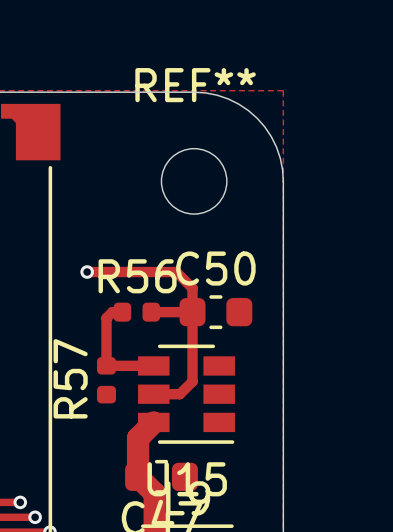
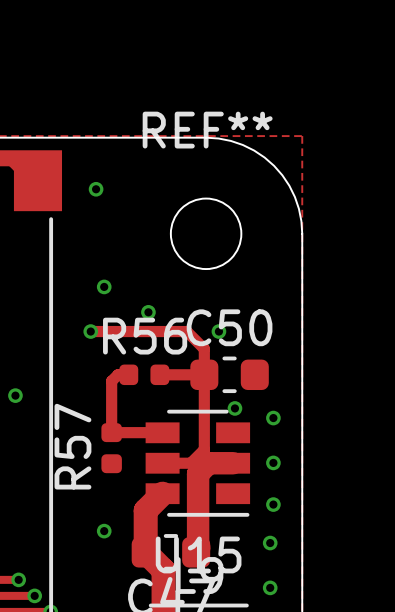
via: none -> (96, 189)
via: none -> (104, 286)
via: none -> (148, 312)
via: none -> (218, 331)
via: none -> (15, 395)
via: none -> (234, 408)
via: none -> (273, 418)
via: none -> (273, 462)
track: none -> (233, 463) (208, 463) (198, 473) (199, 547)
via: none -> (273, 504)
via: none -> (104, 531)
via: none -> (270, 543)
via: none -> (270, 587)

